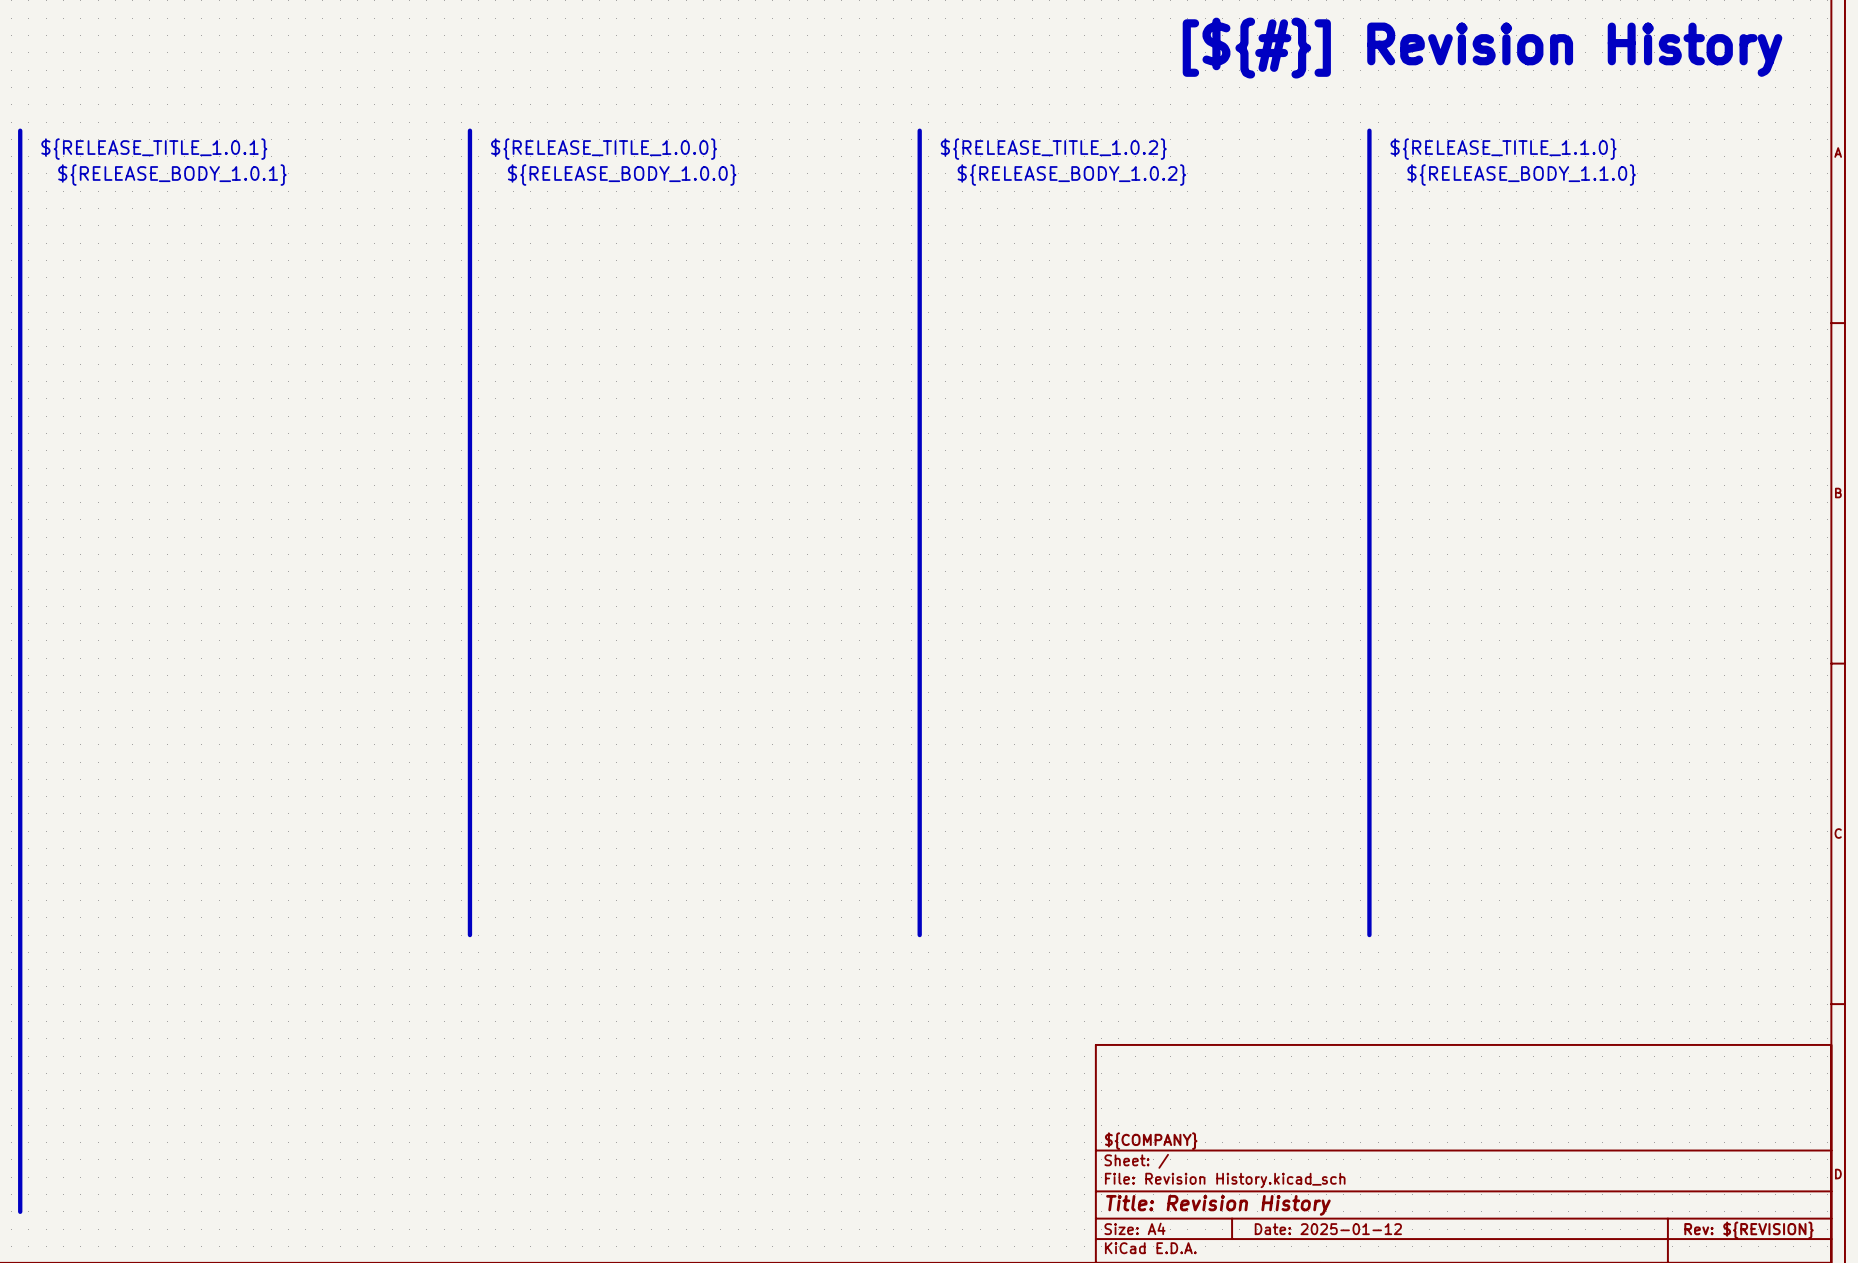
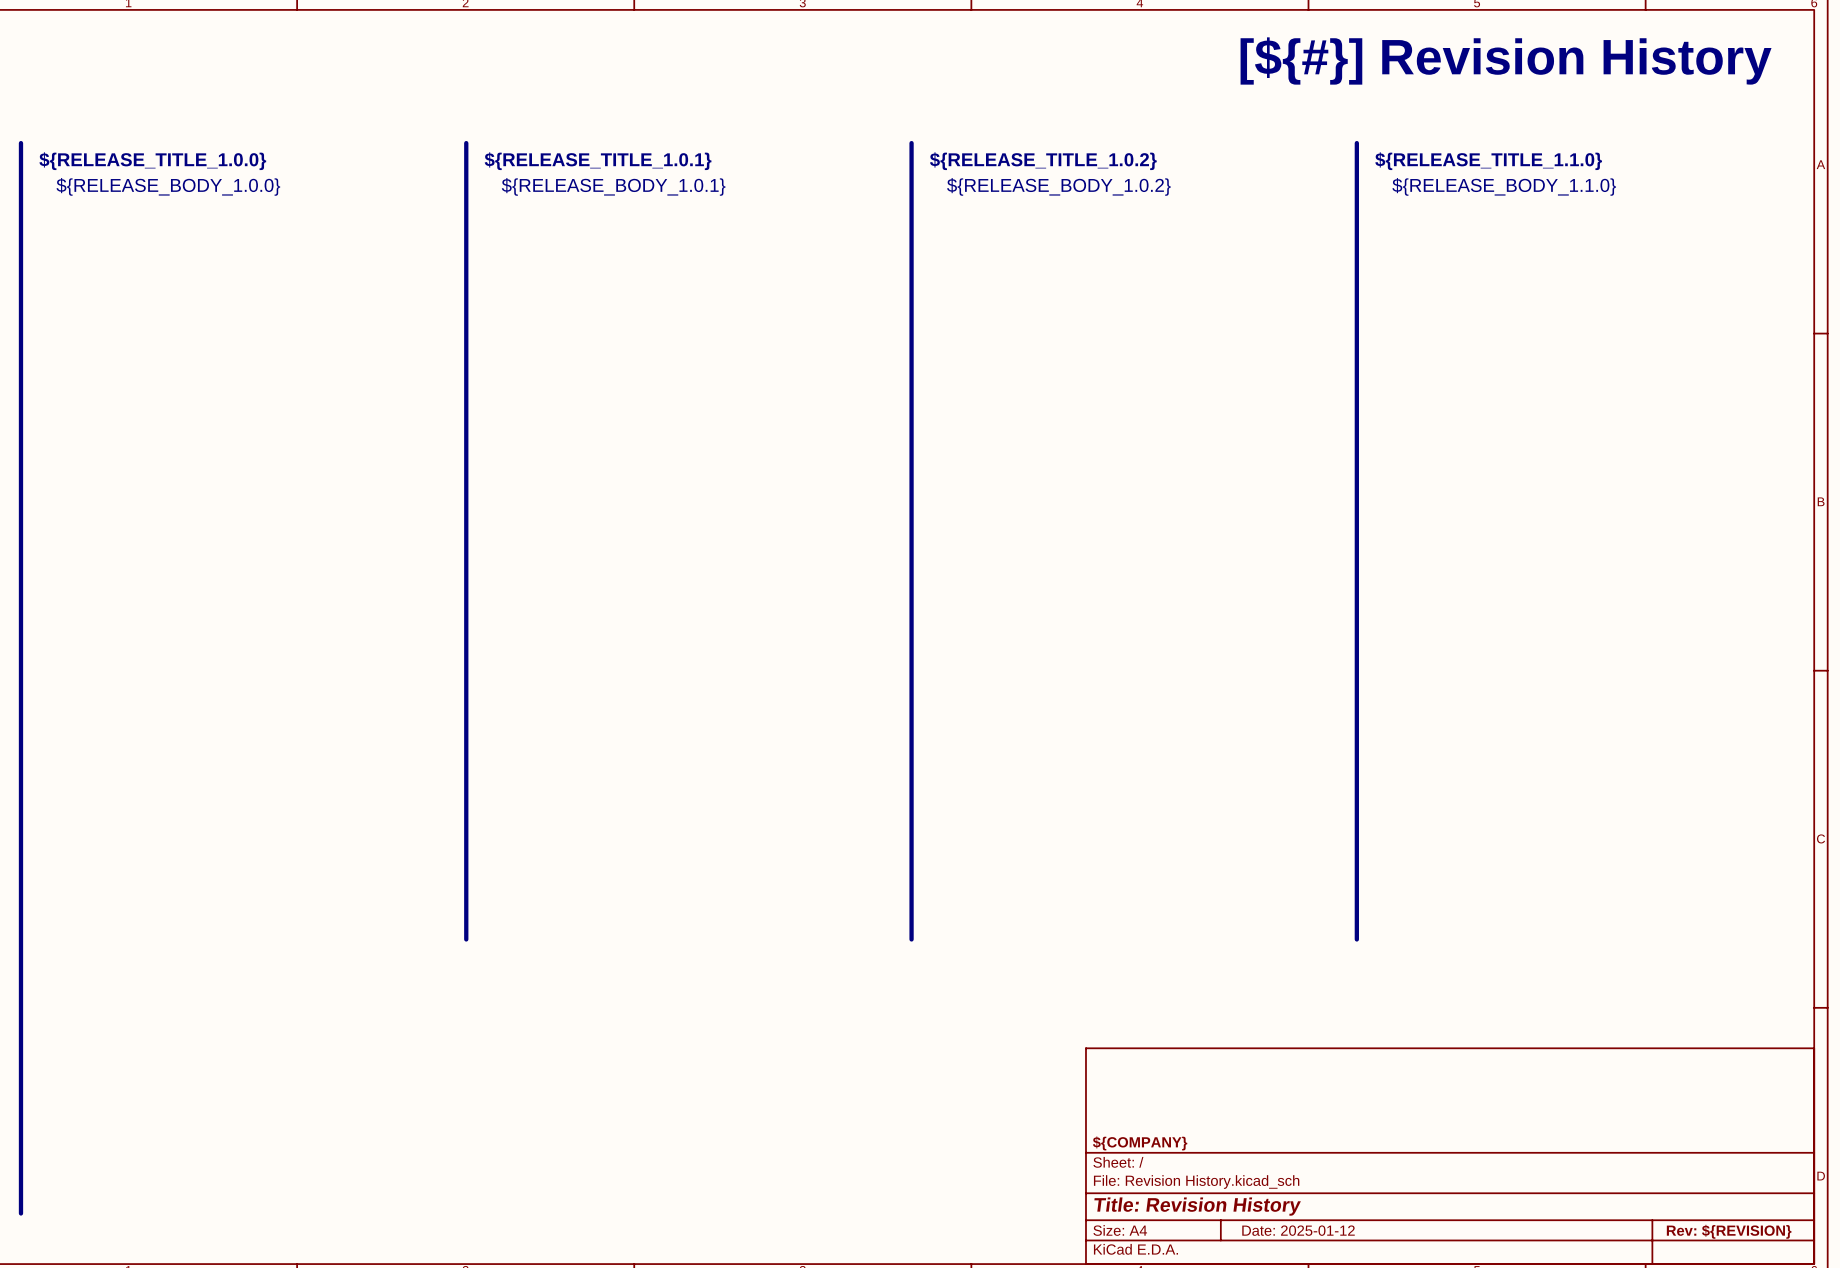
text: ${RELEASE_TITLE_1.0.1} (154, 149) -> ${RELEASE_TITLE_1.0.0} (152, 161)
text: ${RELEASE_TITLE_1.0.0} (604, 149) -> ${RELEASE_TITLE_1.0.1} (598, 161)
text: ${RELEASE_BODY_1.0.1} (172, 175) -> ${RELEASE_BODY_1.0.0} (168, 186)
text: ${RELEASE_BODY_1.0.0} (622, 175) -> ${RELEASE_BODY_1.0.1} (613, 186)

